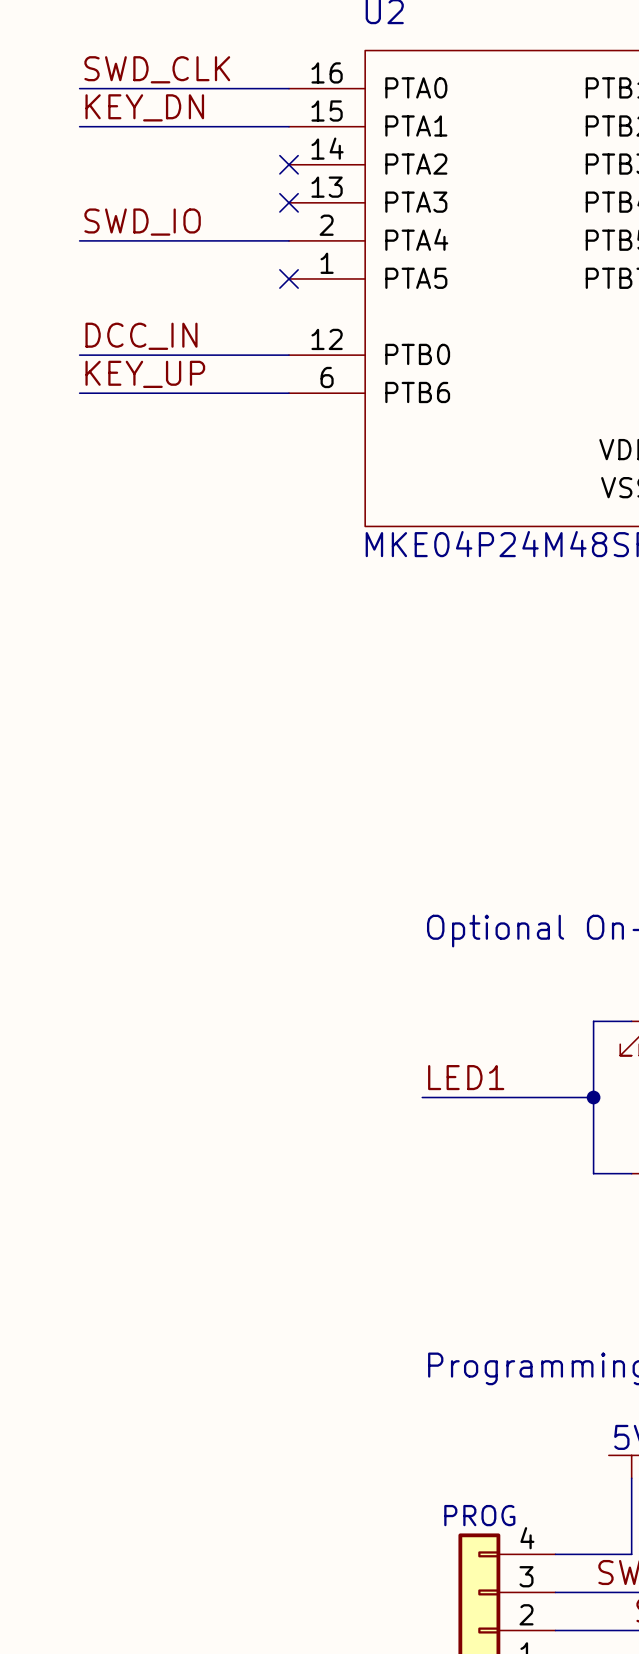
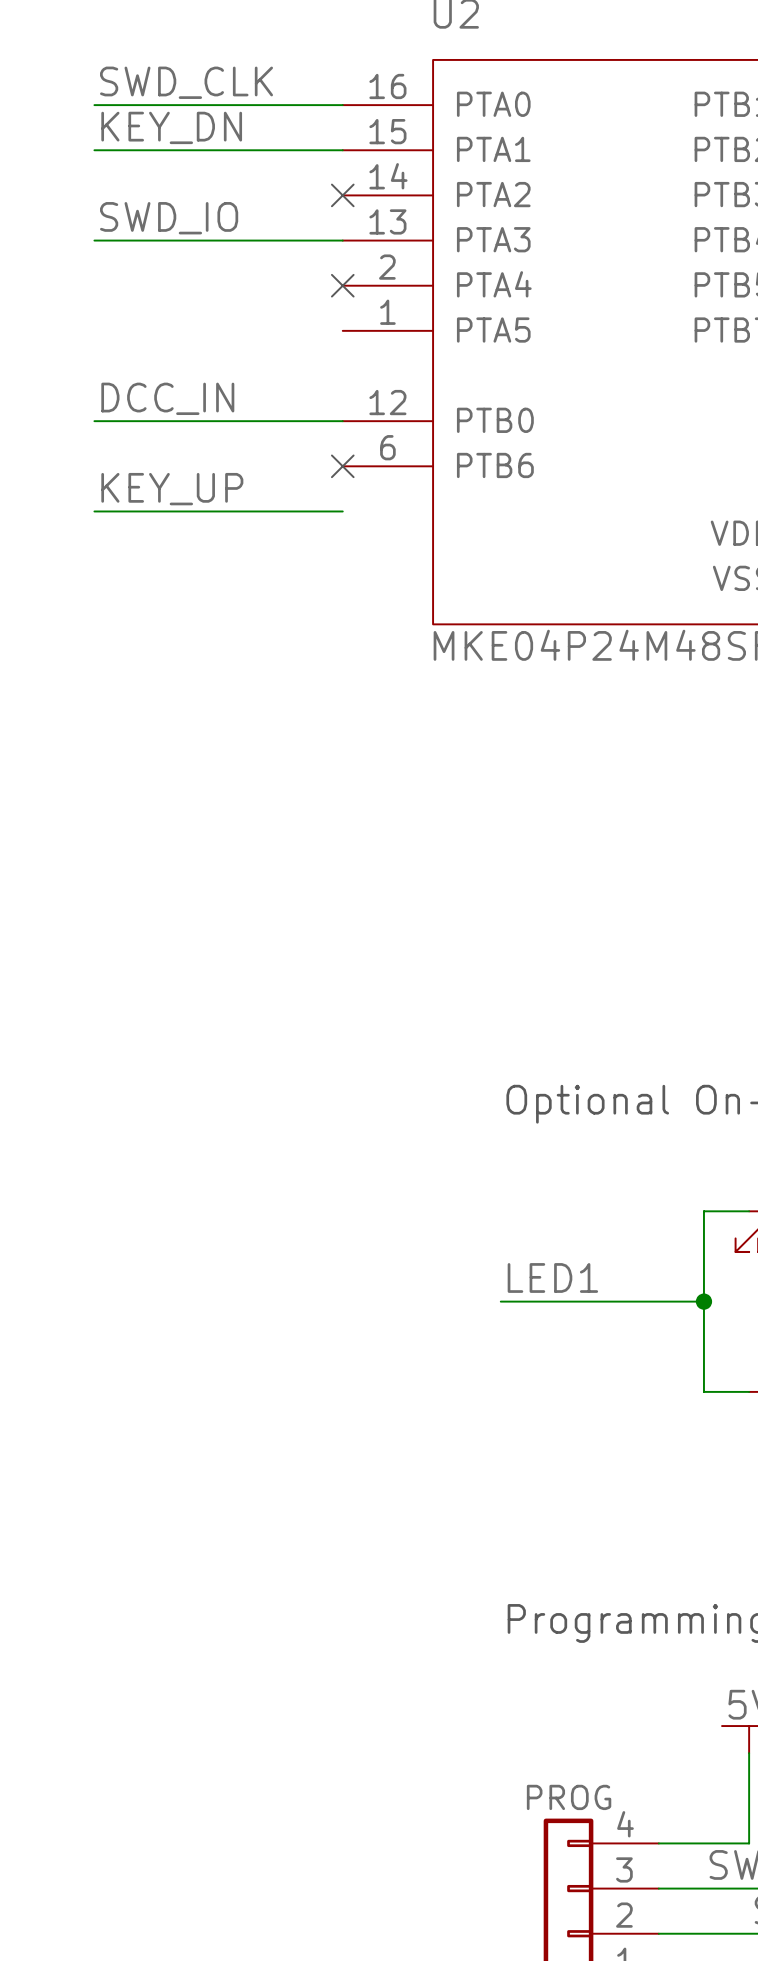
no-connect mark: (289, 202) -> none
label position: SWD_IO (142, 222) -> SWD_IO (169, 218)
wire: (79, 240) (289, 240) -> (94, 240) (342, 240)
no-connect mark: none -> (342, 285)
no-connect mark: (289, 278) -> none
label position: KEY_UP (145, 374) -> KEY_UP (172, 489)
wire: (79, 393) (289, 393) -> (94, 511) (342, 511)
no-connect mark: none -> (342, 466)

